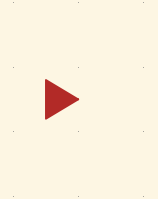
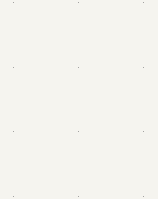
part: (62, 99) -> none

